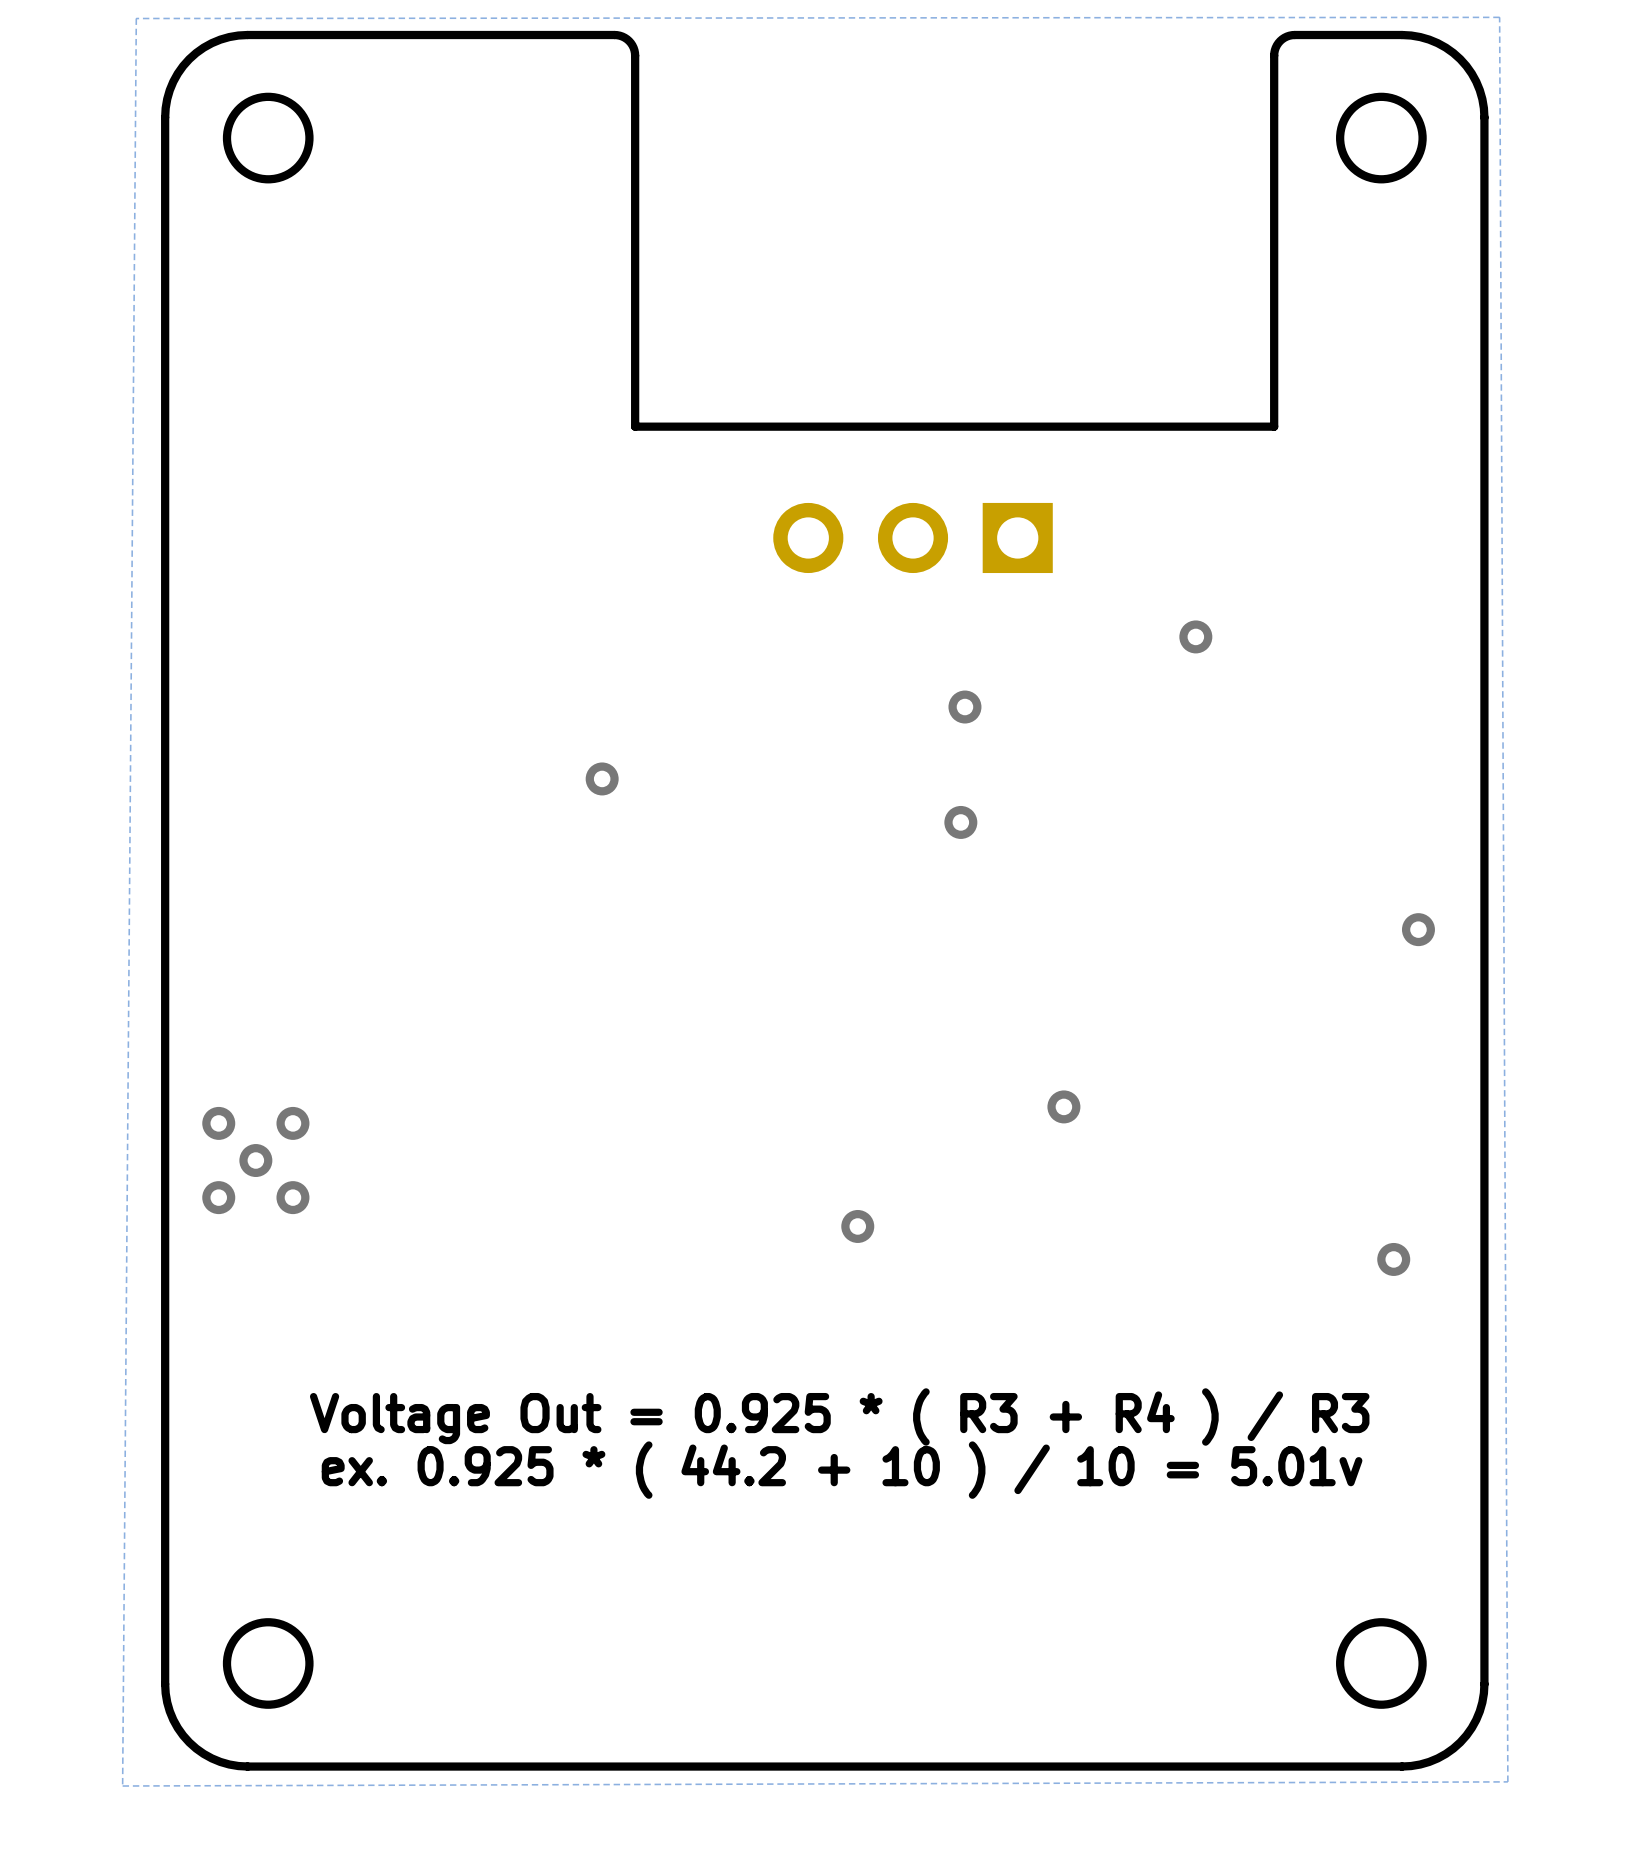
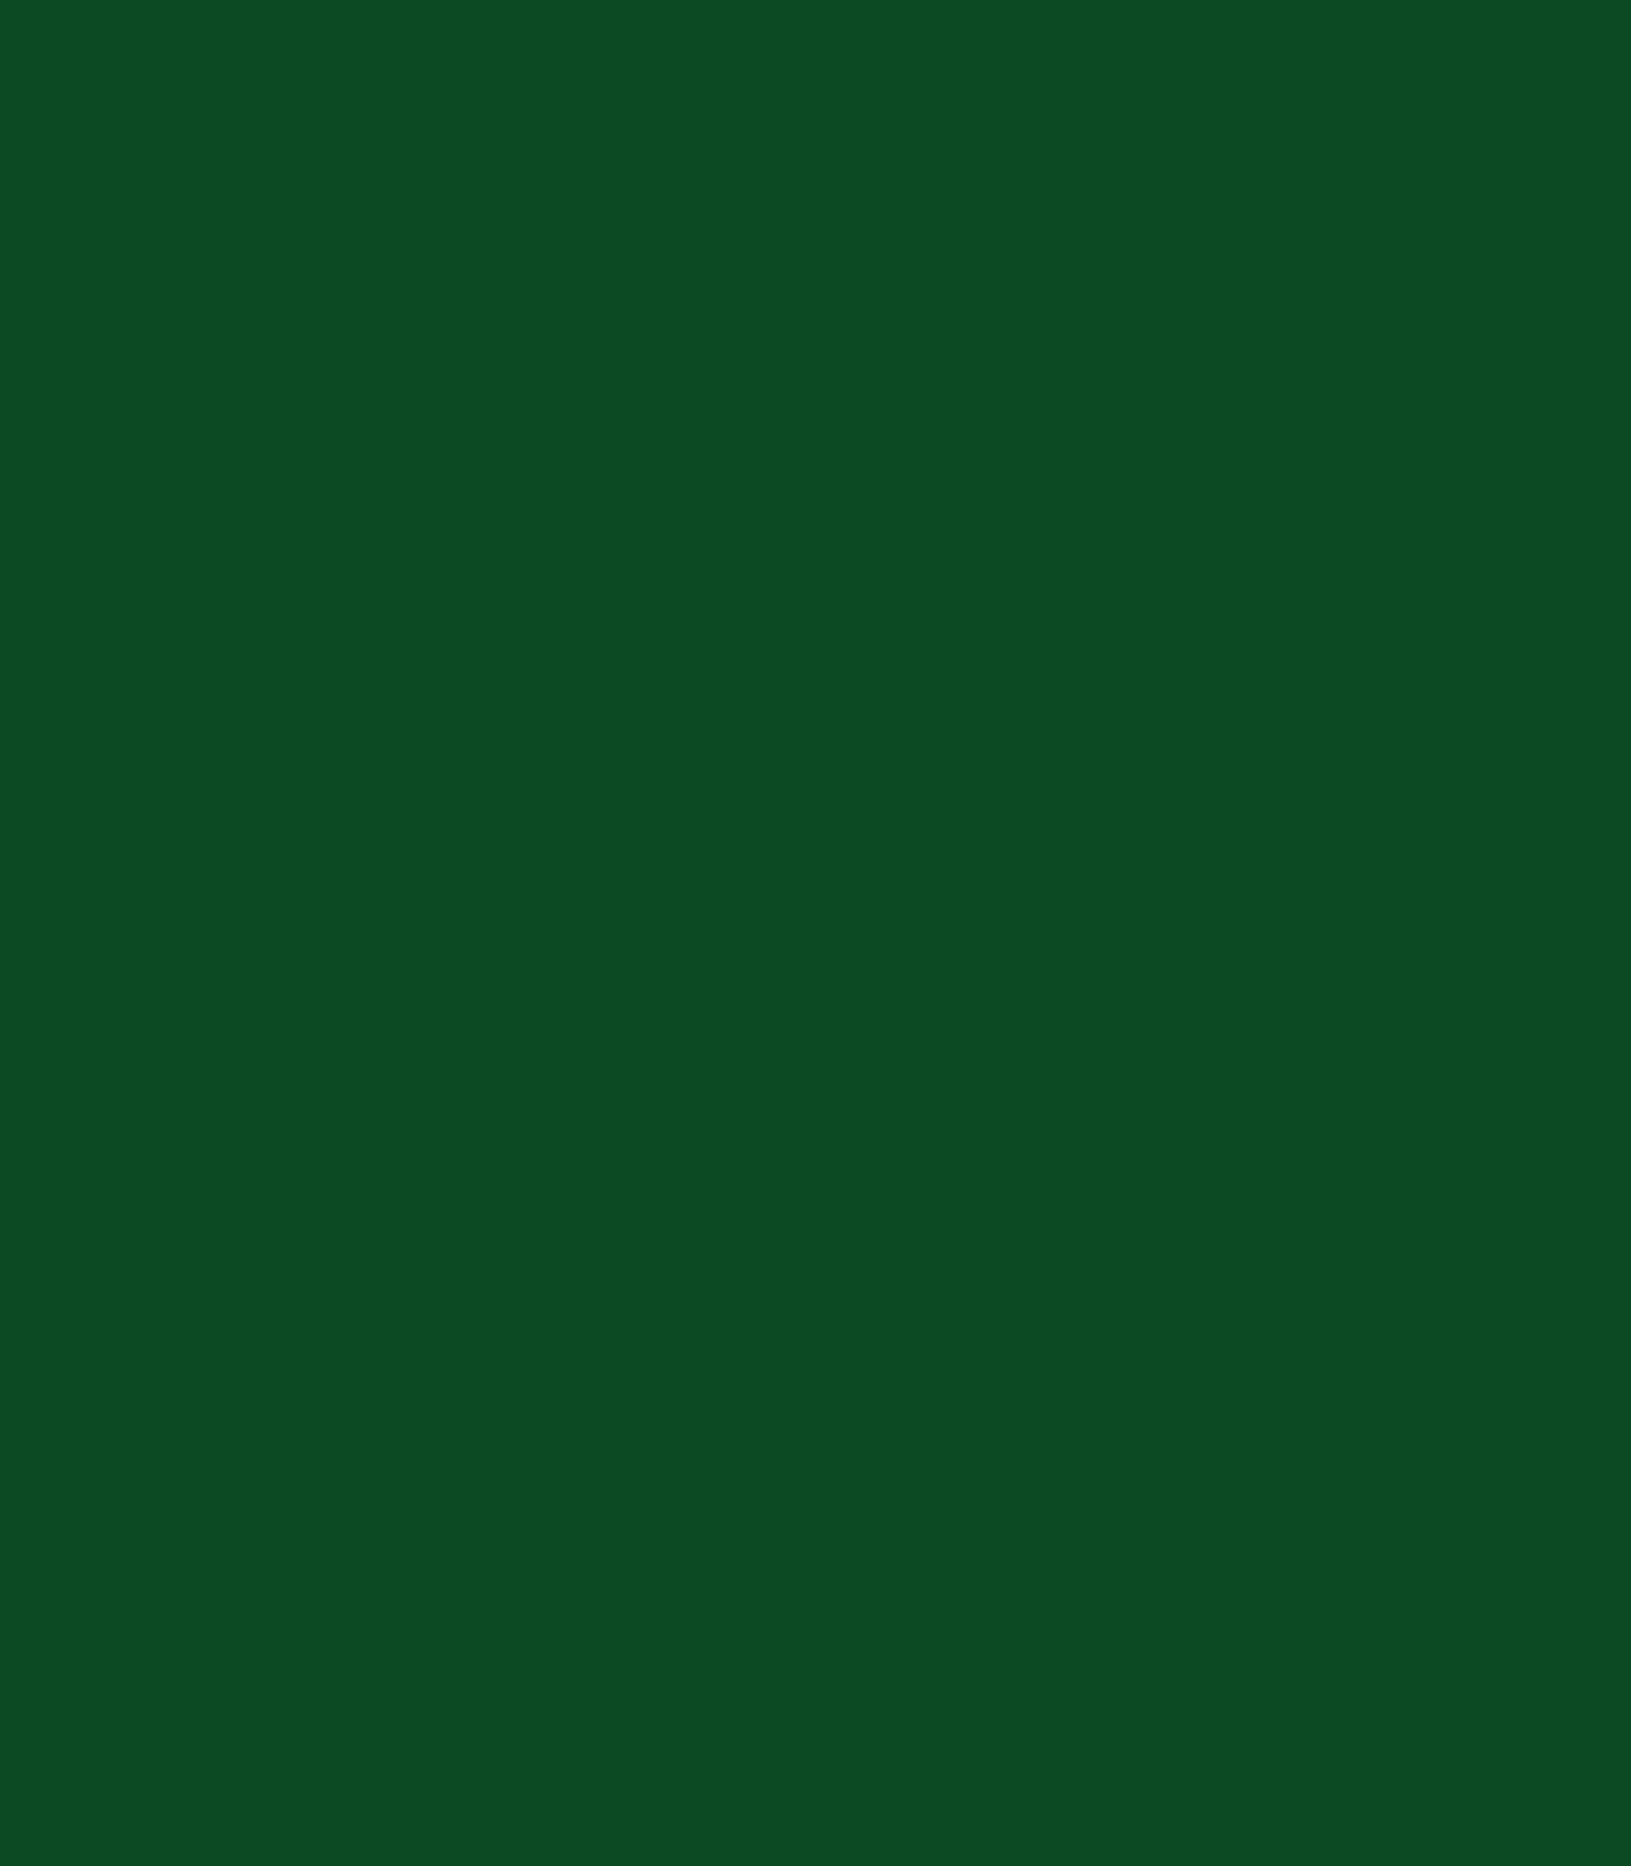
zone outline: (1499, 17) (136, 18) (122, 1786) (1507, 1781) (1499, 17) -> none
board edge: (1401, 35) (1292, 35) (1280, 41) (1274, 50) (1274, 426) (635, 426) (635, 55) (633, 47) (627, 39) (614, 35) (238, 35) (220, 39) (203, 47) (189, 59) (177, 73) (167, 99) (165, 117) (165, 1684) (167, 1702) (177, 1727) (189, 1742) (203, 1753) (220, 1761) (247, 1766) (1401, 1766) (1420, 1764) (1437, 1758) (1453, 1748) (1471, 1727) (1479, 1711) (1484, 1684) (1484, 117) (1482, 99) (1476, 81) (1460, 59) (1445, 47) (1429, 39) (1401, 35) -> none
round board edge: [222, 92, 314, 184] -> none
round board edge: [1336, 92, 1427, 184] -> none
part: (913, 537) -> none
via: (1195, 636) -> none
via: (964, 707) -> none
via: (602, 778) -> none
via: (960, 822) -> none
via: (1418, 929) -> none
via: (1063, 1106) -> none
via: (218, 1123) -> none
via: (292, 1123) -> none
via: (255, 1160) -> none
via: (218, 1197) -> none
via: (292, 1197) -> none
via: (857, 1226) -> none
via: (1393, 1259) -> none
text: Voltage Out = 0.925 * ( R3 + R4 ) / R3 (839, 1417) -> none
text: ex. 0.925 * ( 44.2 + 10 ) / 10 = 5.01v (842, 1470) -> none
round board edge: [222, 1618, 314, 1709] -> none
round board edge: [1336, 1618, 1427, 1709] -> none

